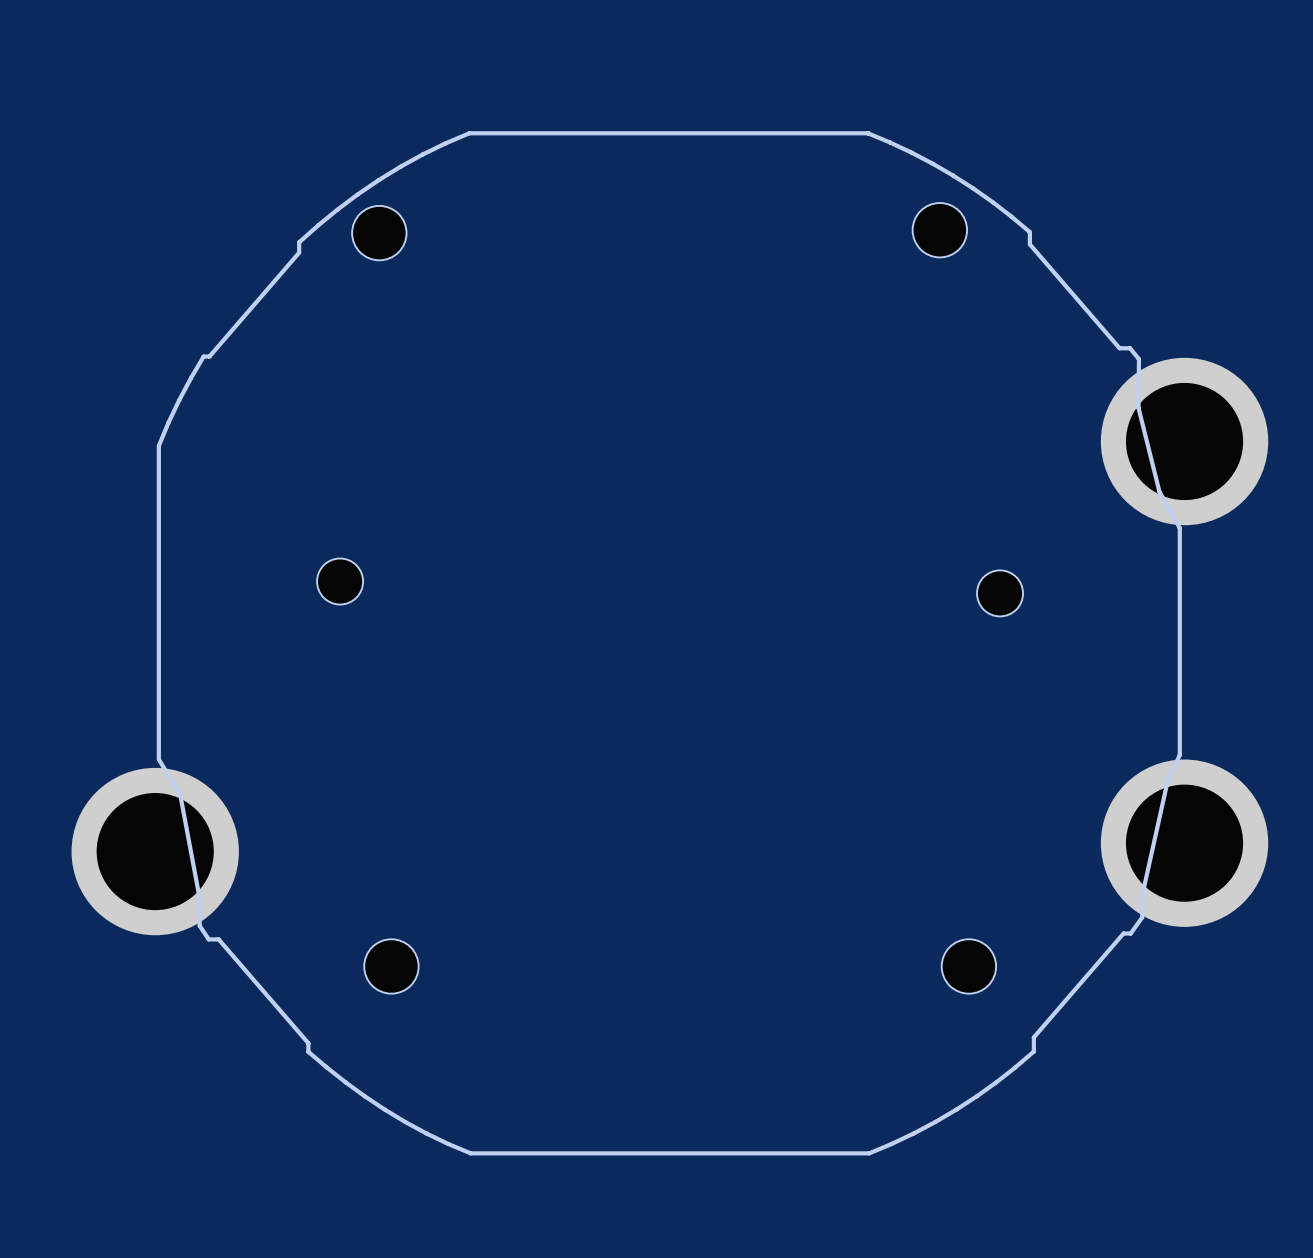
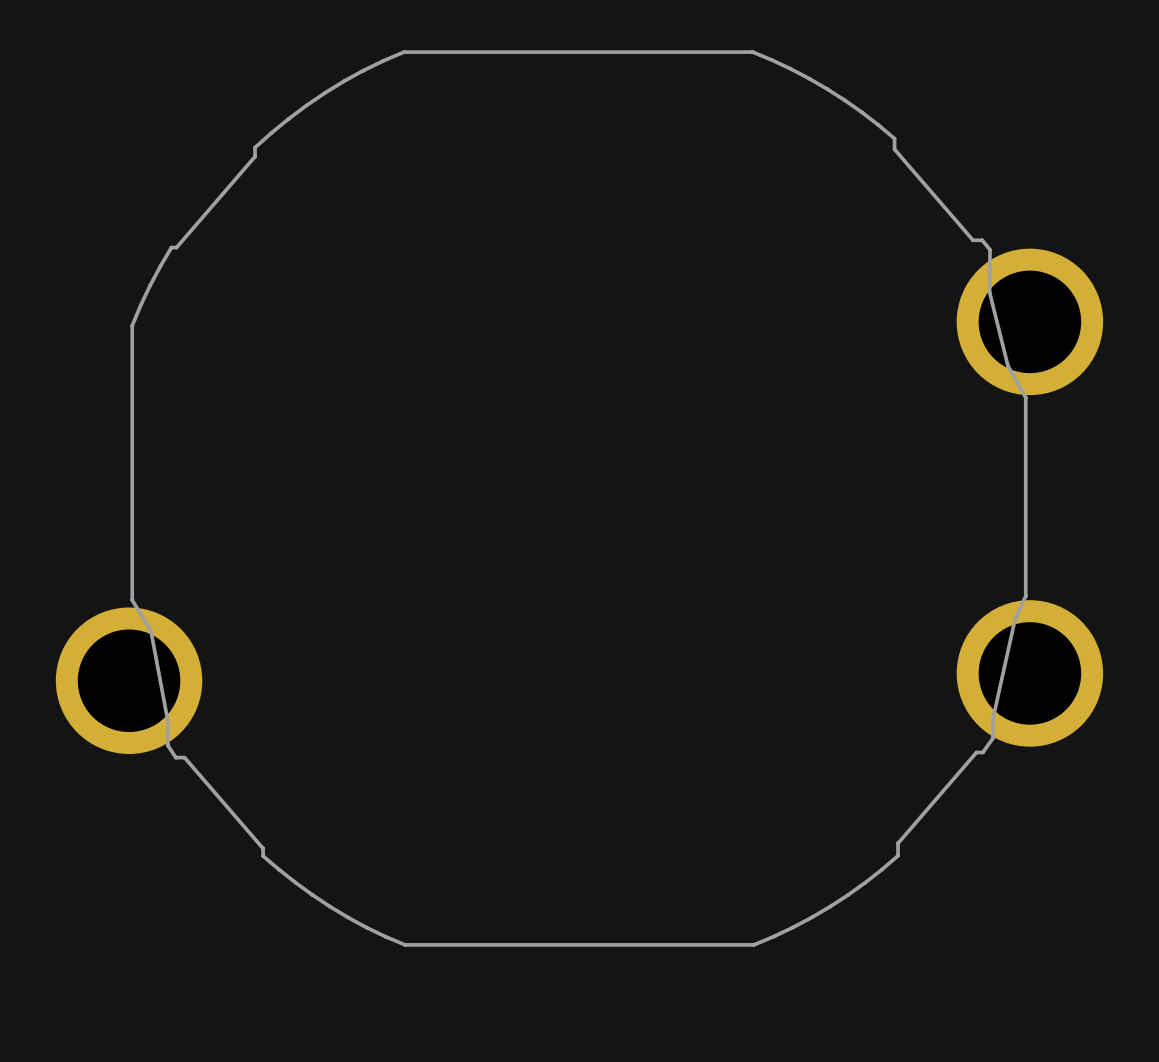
part: (939, 230) -> none
part: (379, 233) -> none
part: (340, 581) -> none
part: (1000, 593) -> none
part: (391, 966) -> none
part: (968, 966) -> none

